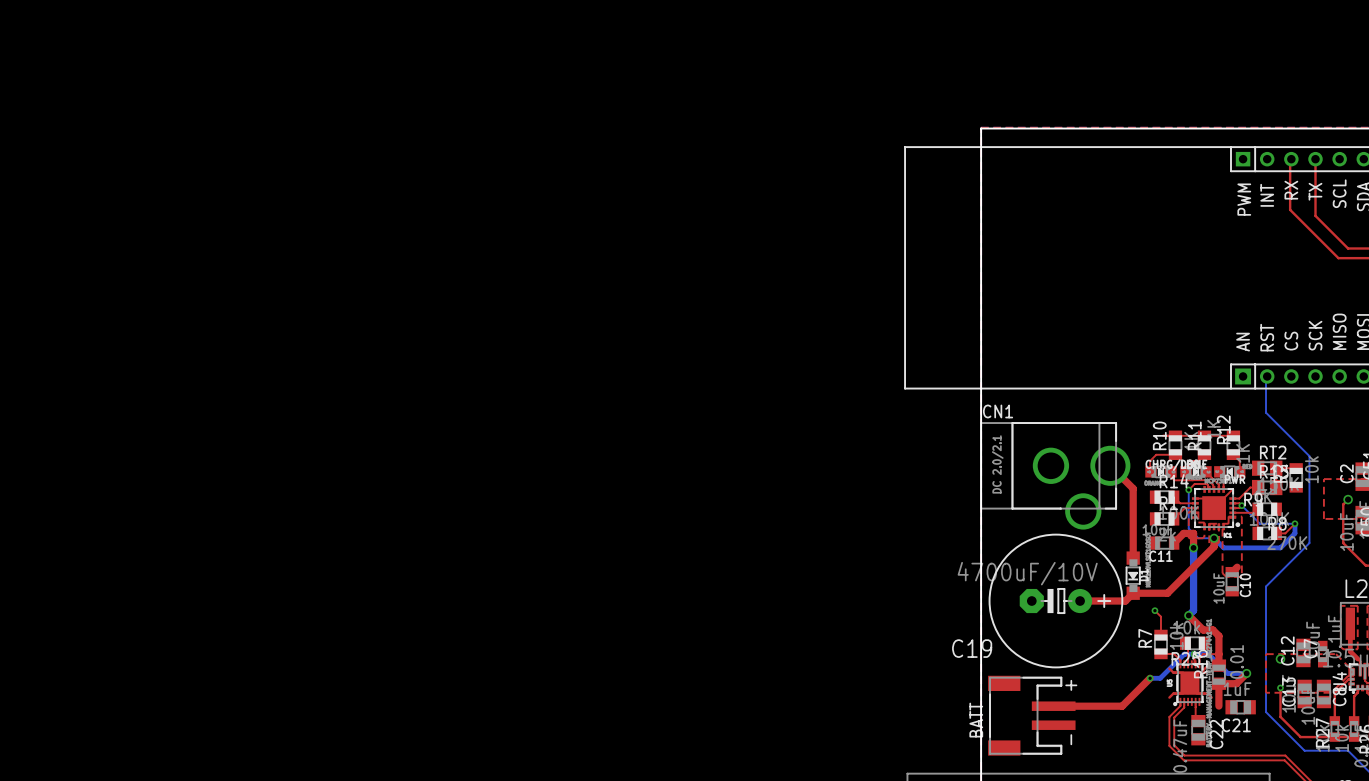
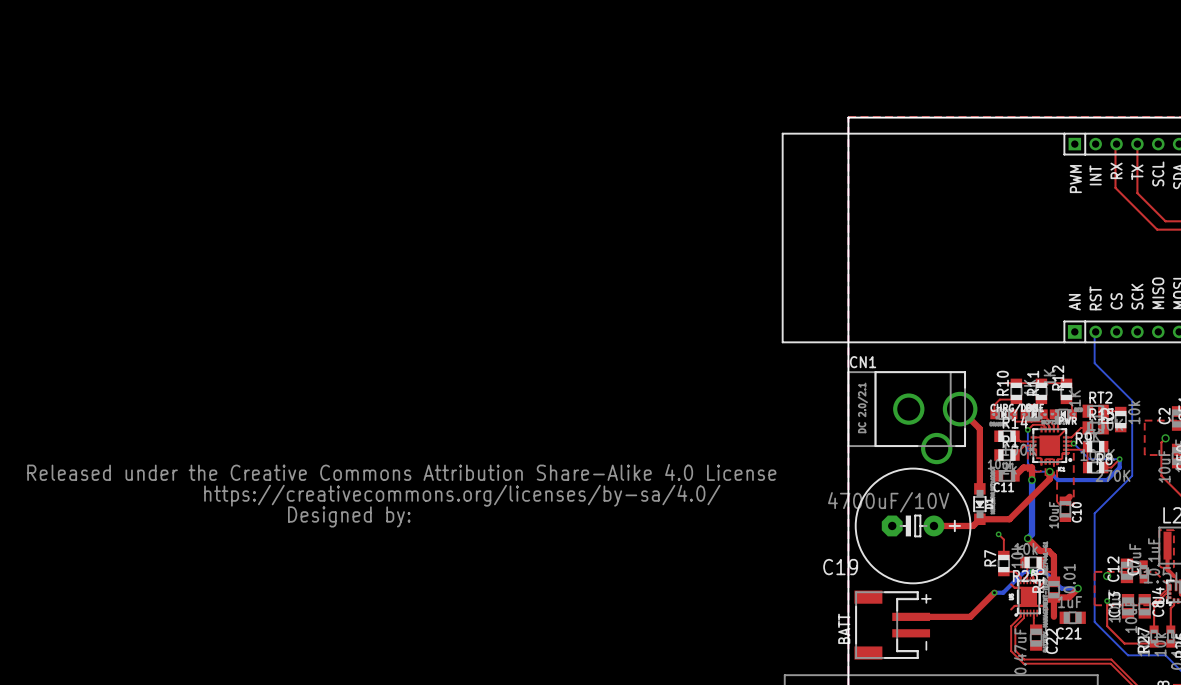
drawing: none -> [27, 464, 777, 528]

